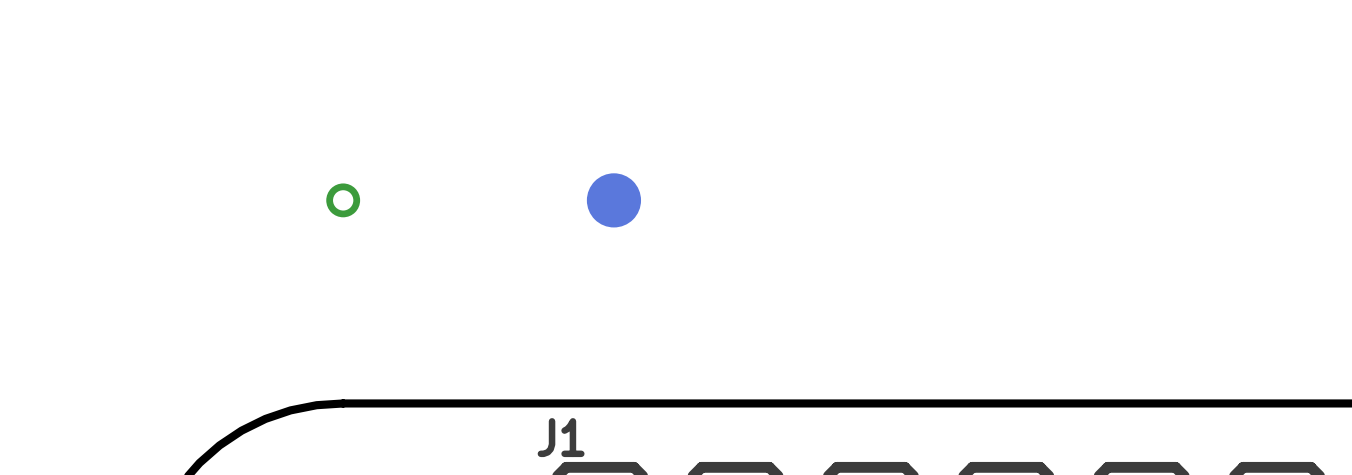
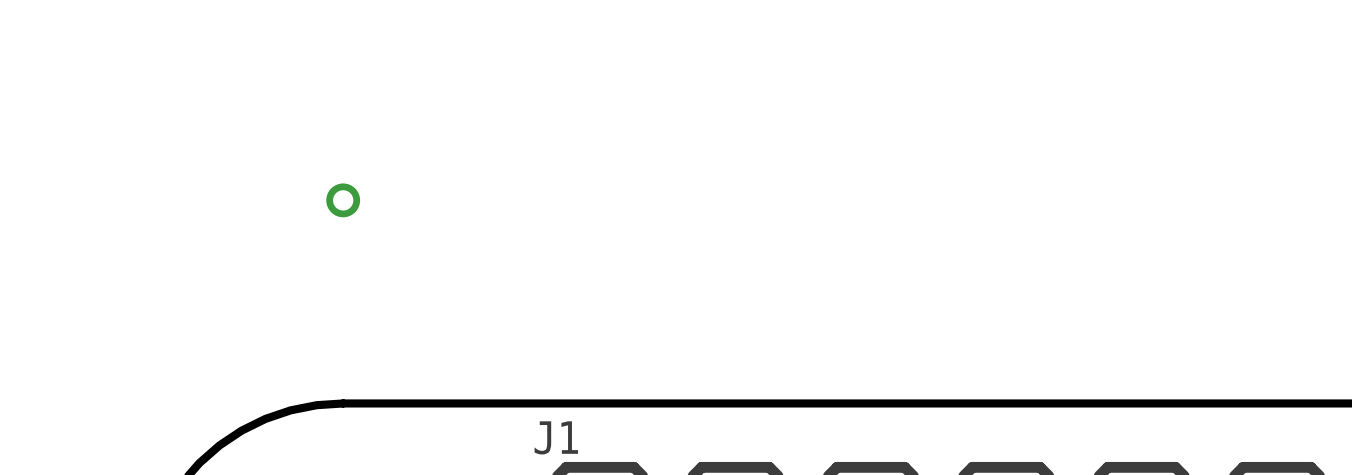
part: (613, 200) -> none

